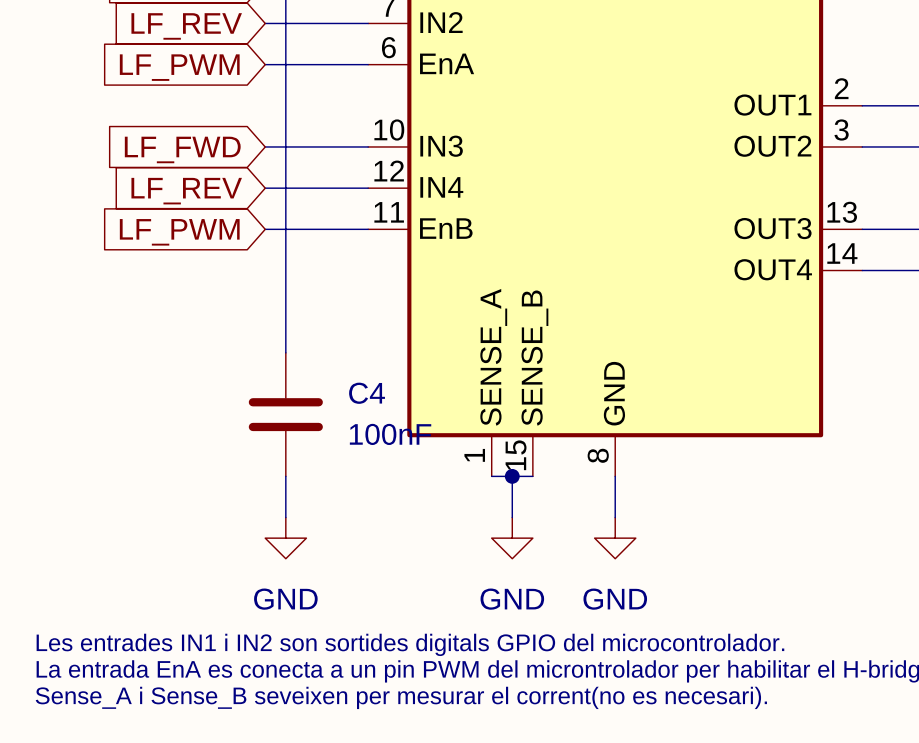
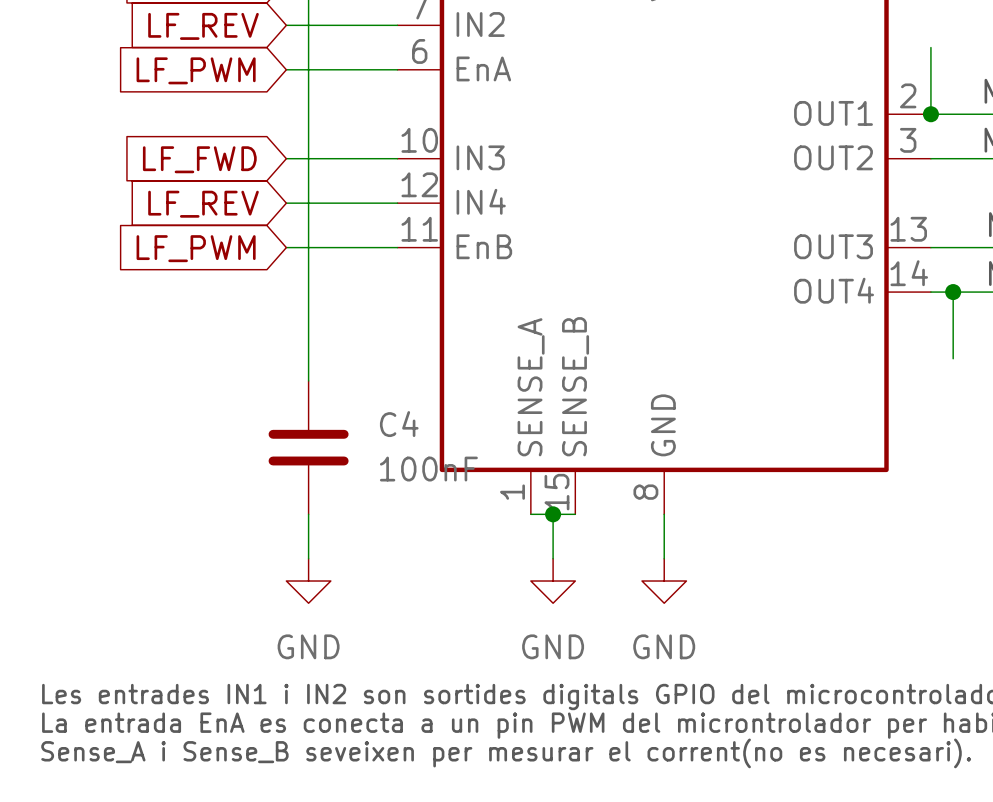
wire: none -> (930, 47) (930, 114)
junction: none -> (930, 114)
wire: none -> (953, 292) (953, 358)
junction: none -> (953, 292)

